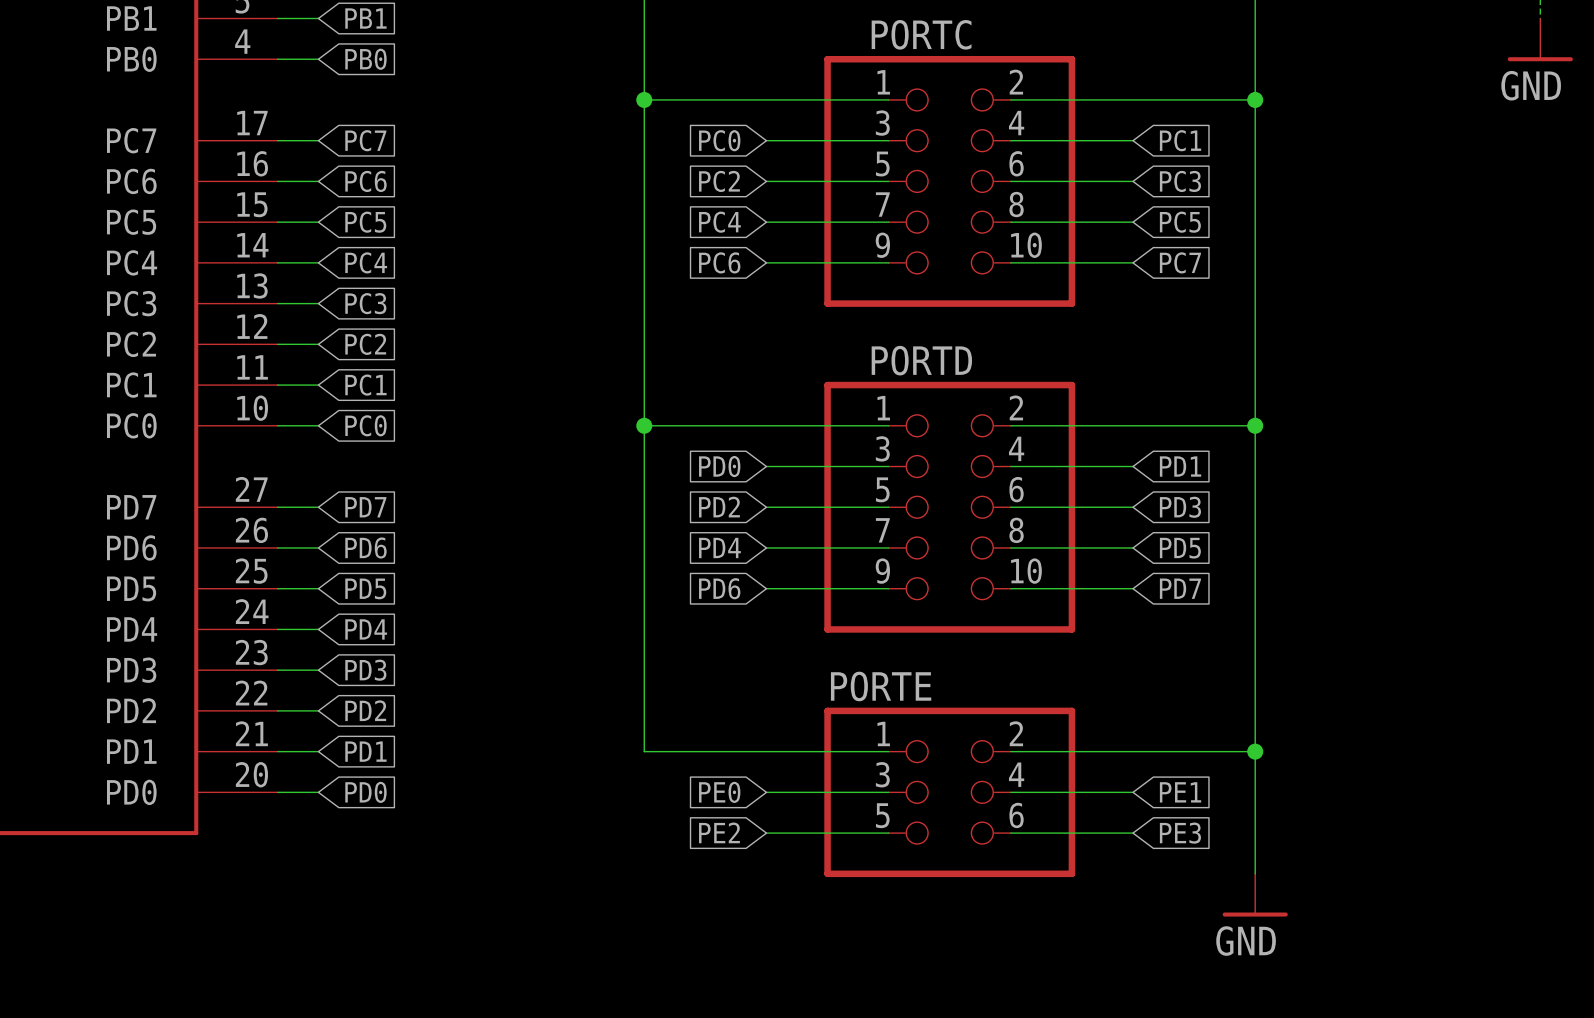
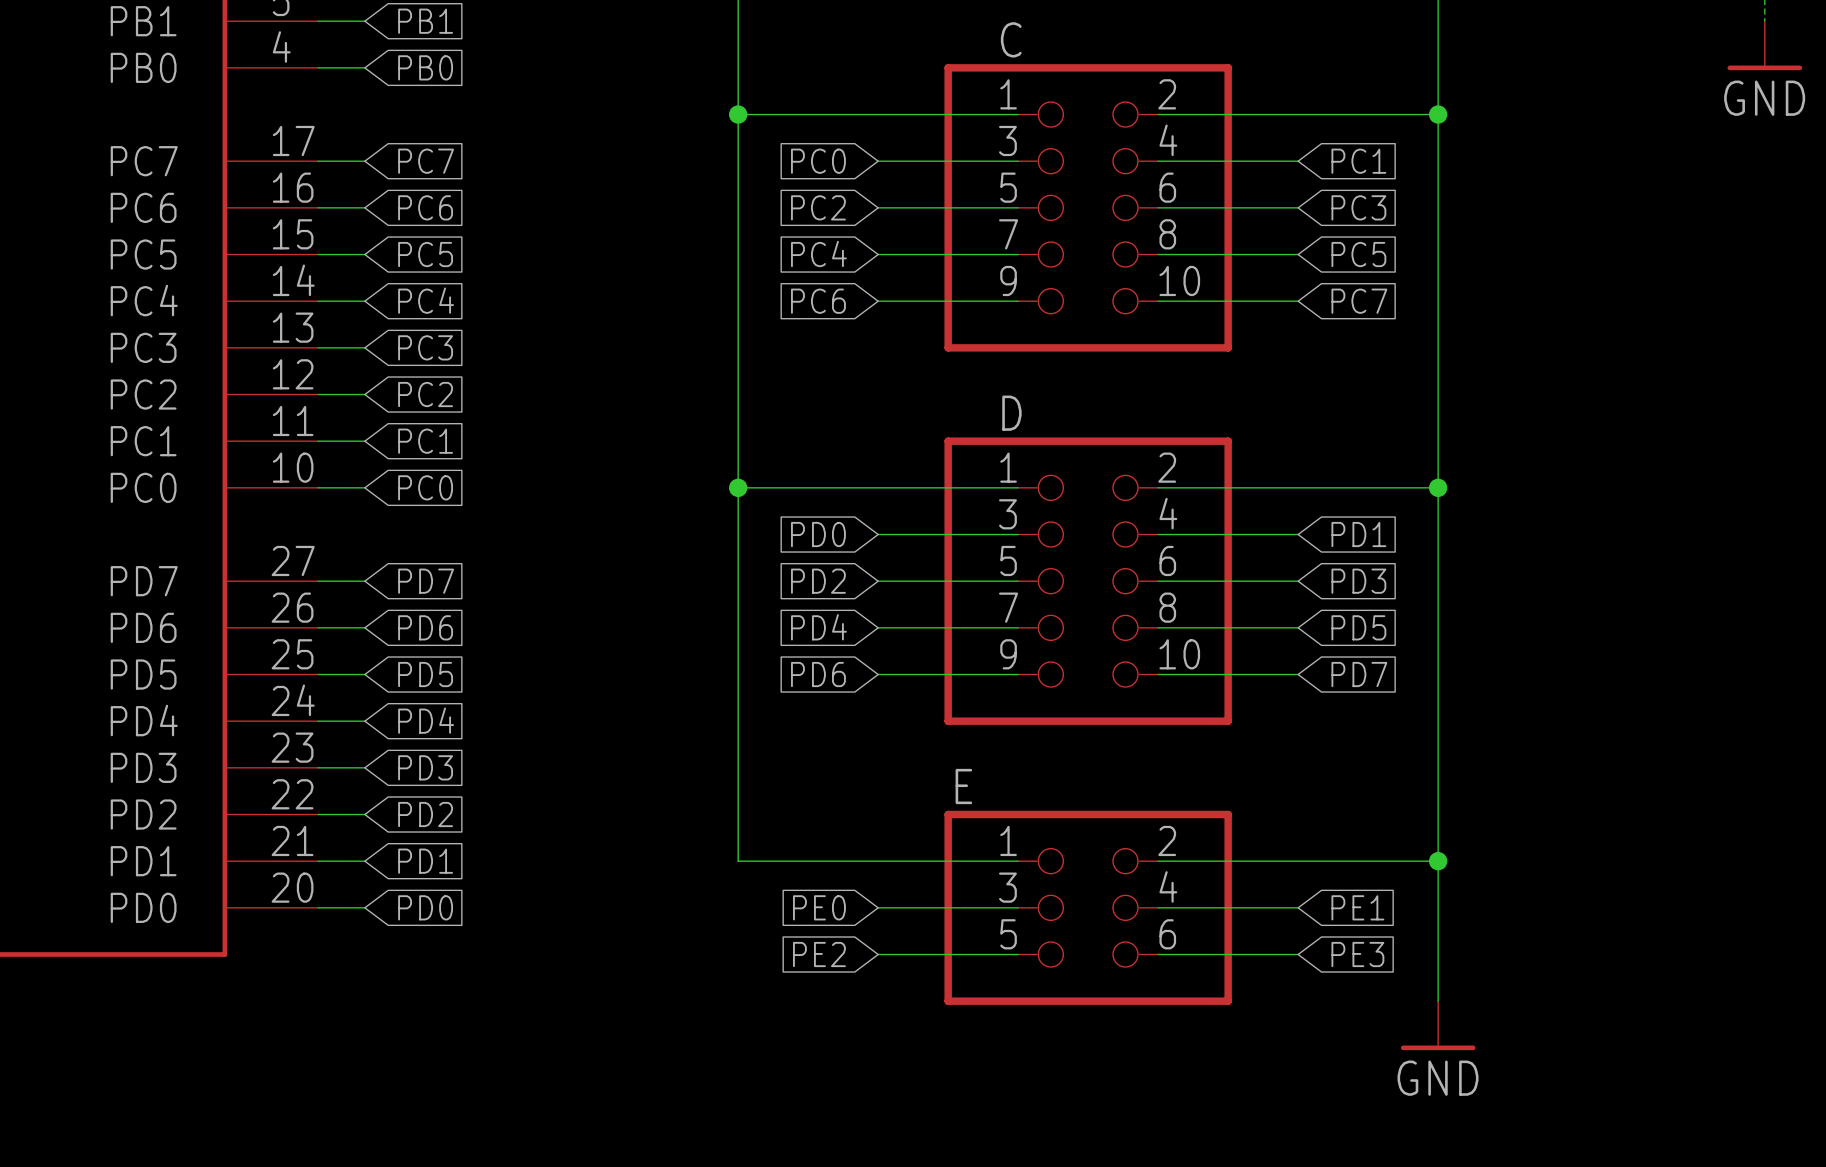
PORTC name: PORTC (921, 34) -> C (1011, 39)
PORTD name: PORTD (921, 360) -> D (1011, 413)
PORTE name: PORTE (881, 686) -> E (963, 786)

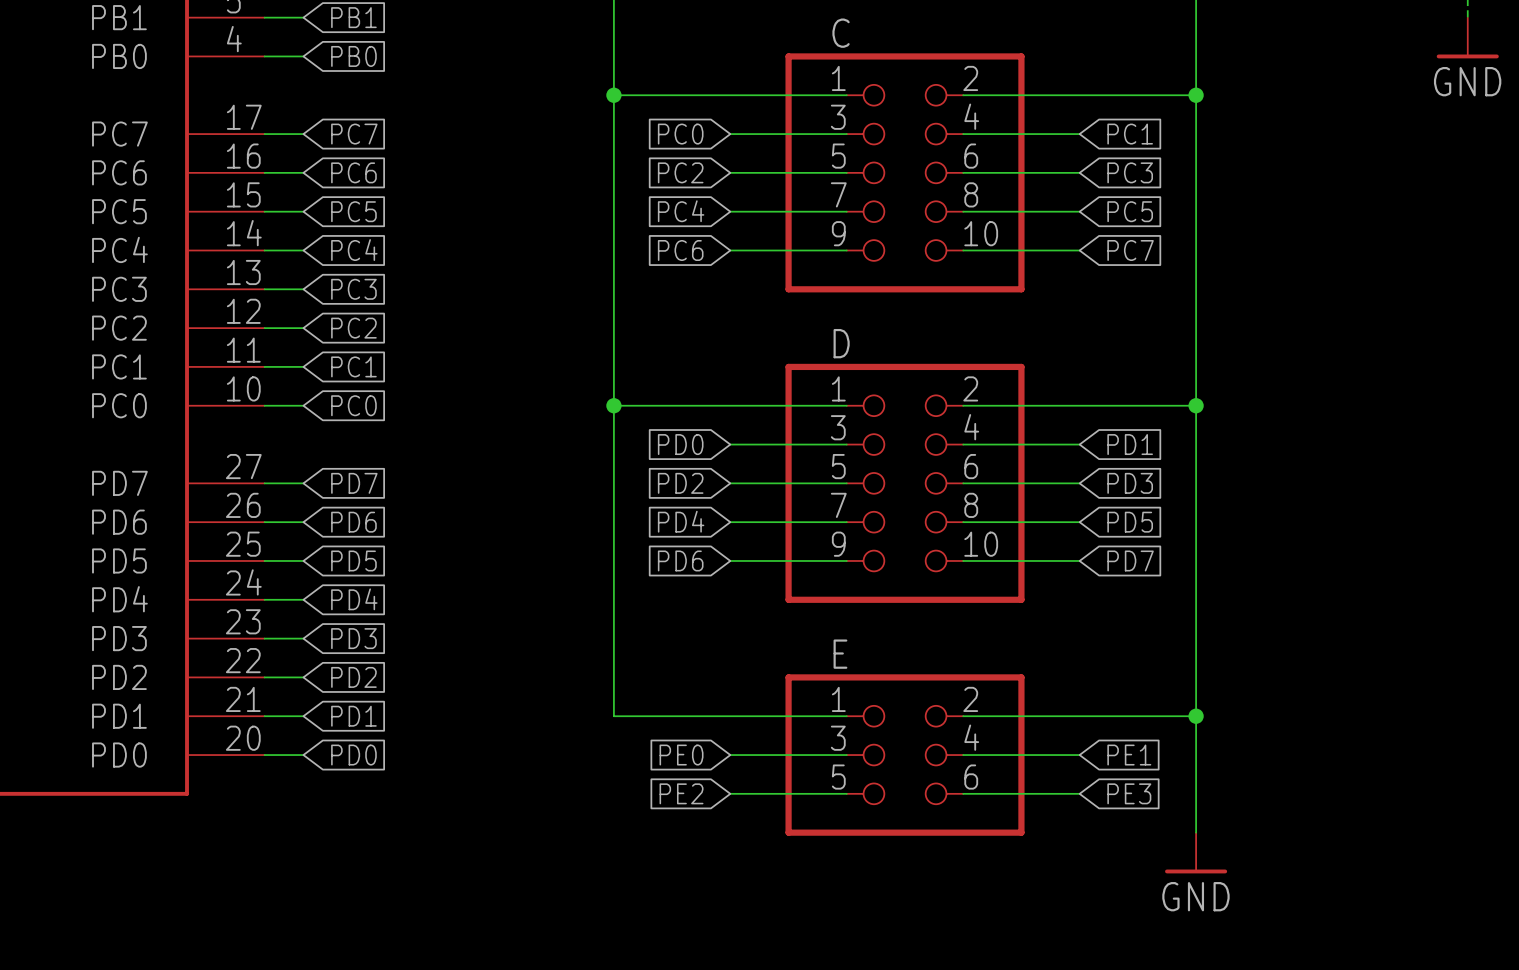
E name position: E (963, 786) -> E (840, 654)

